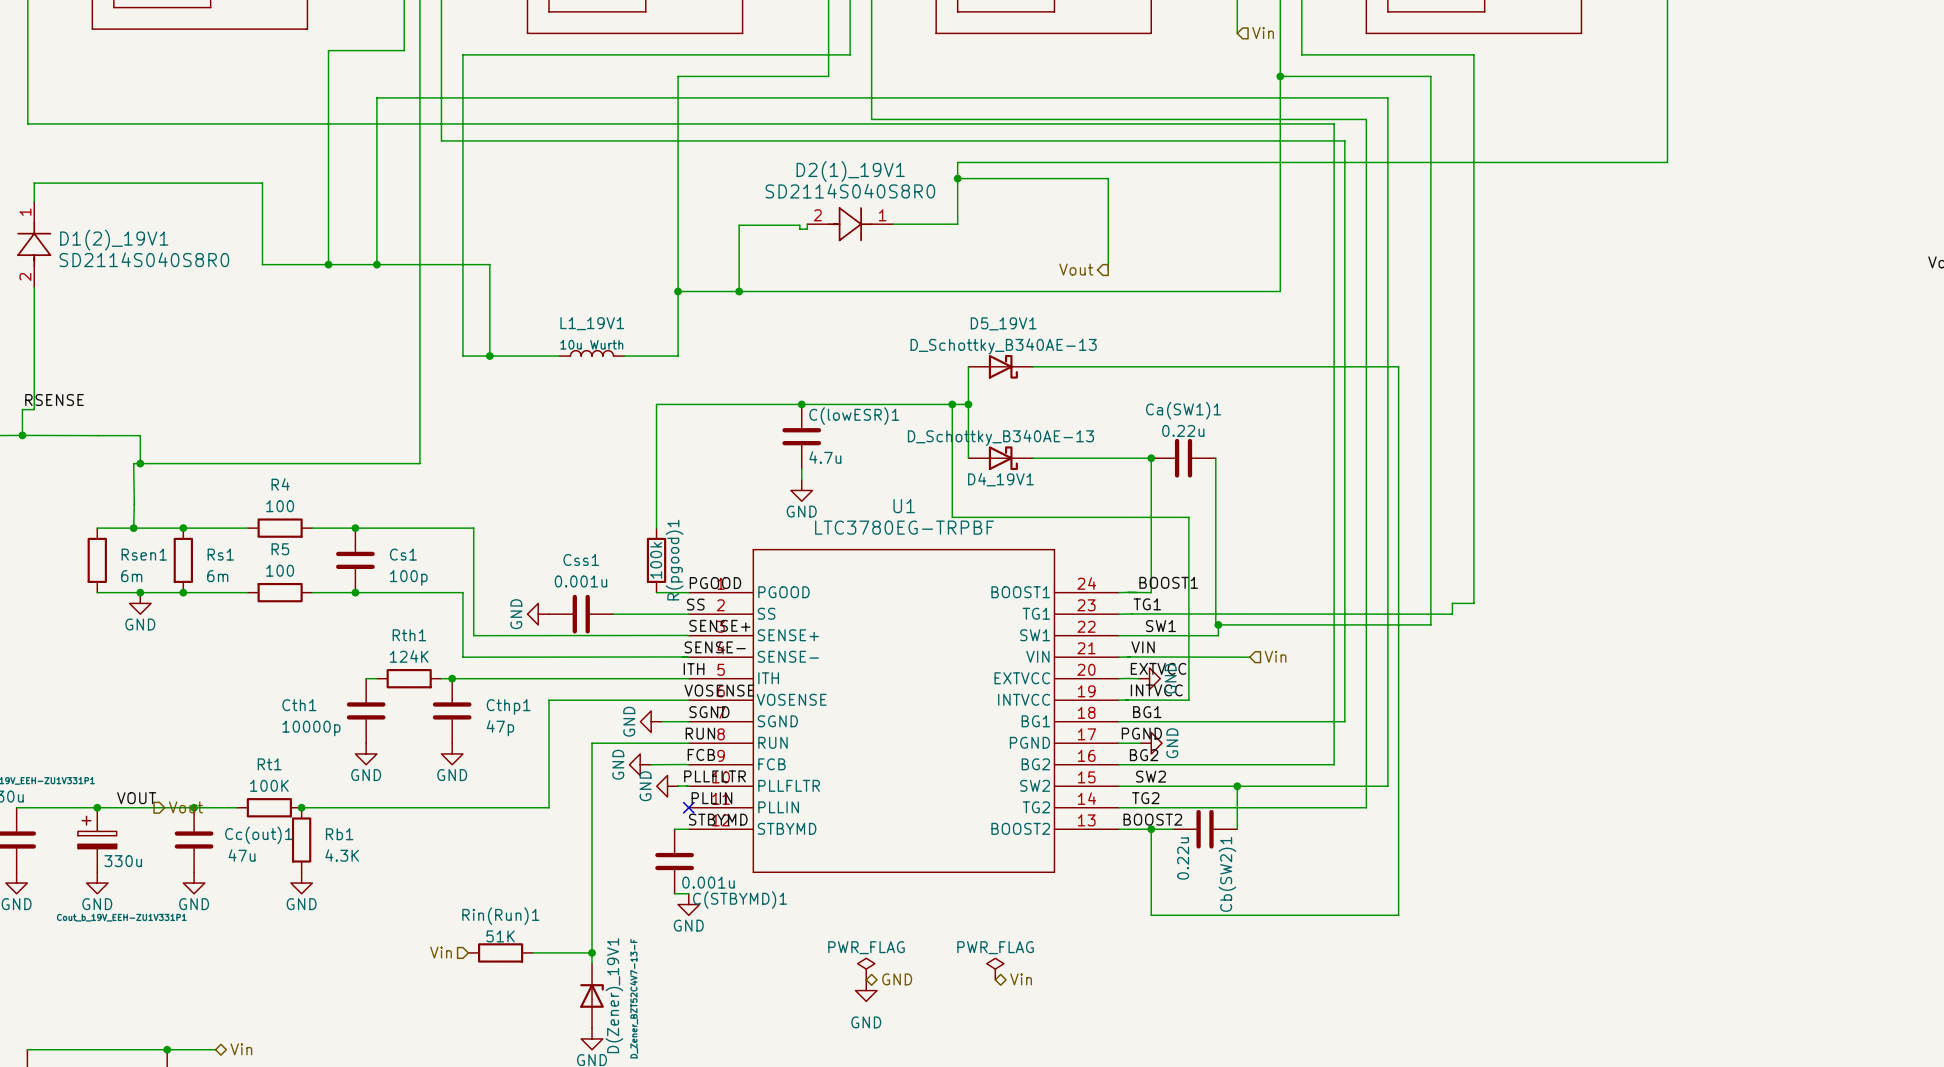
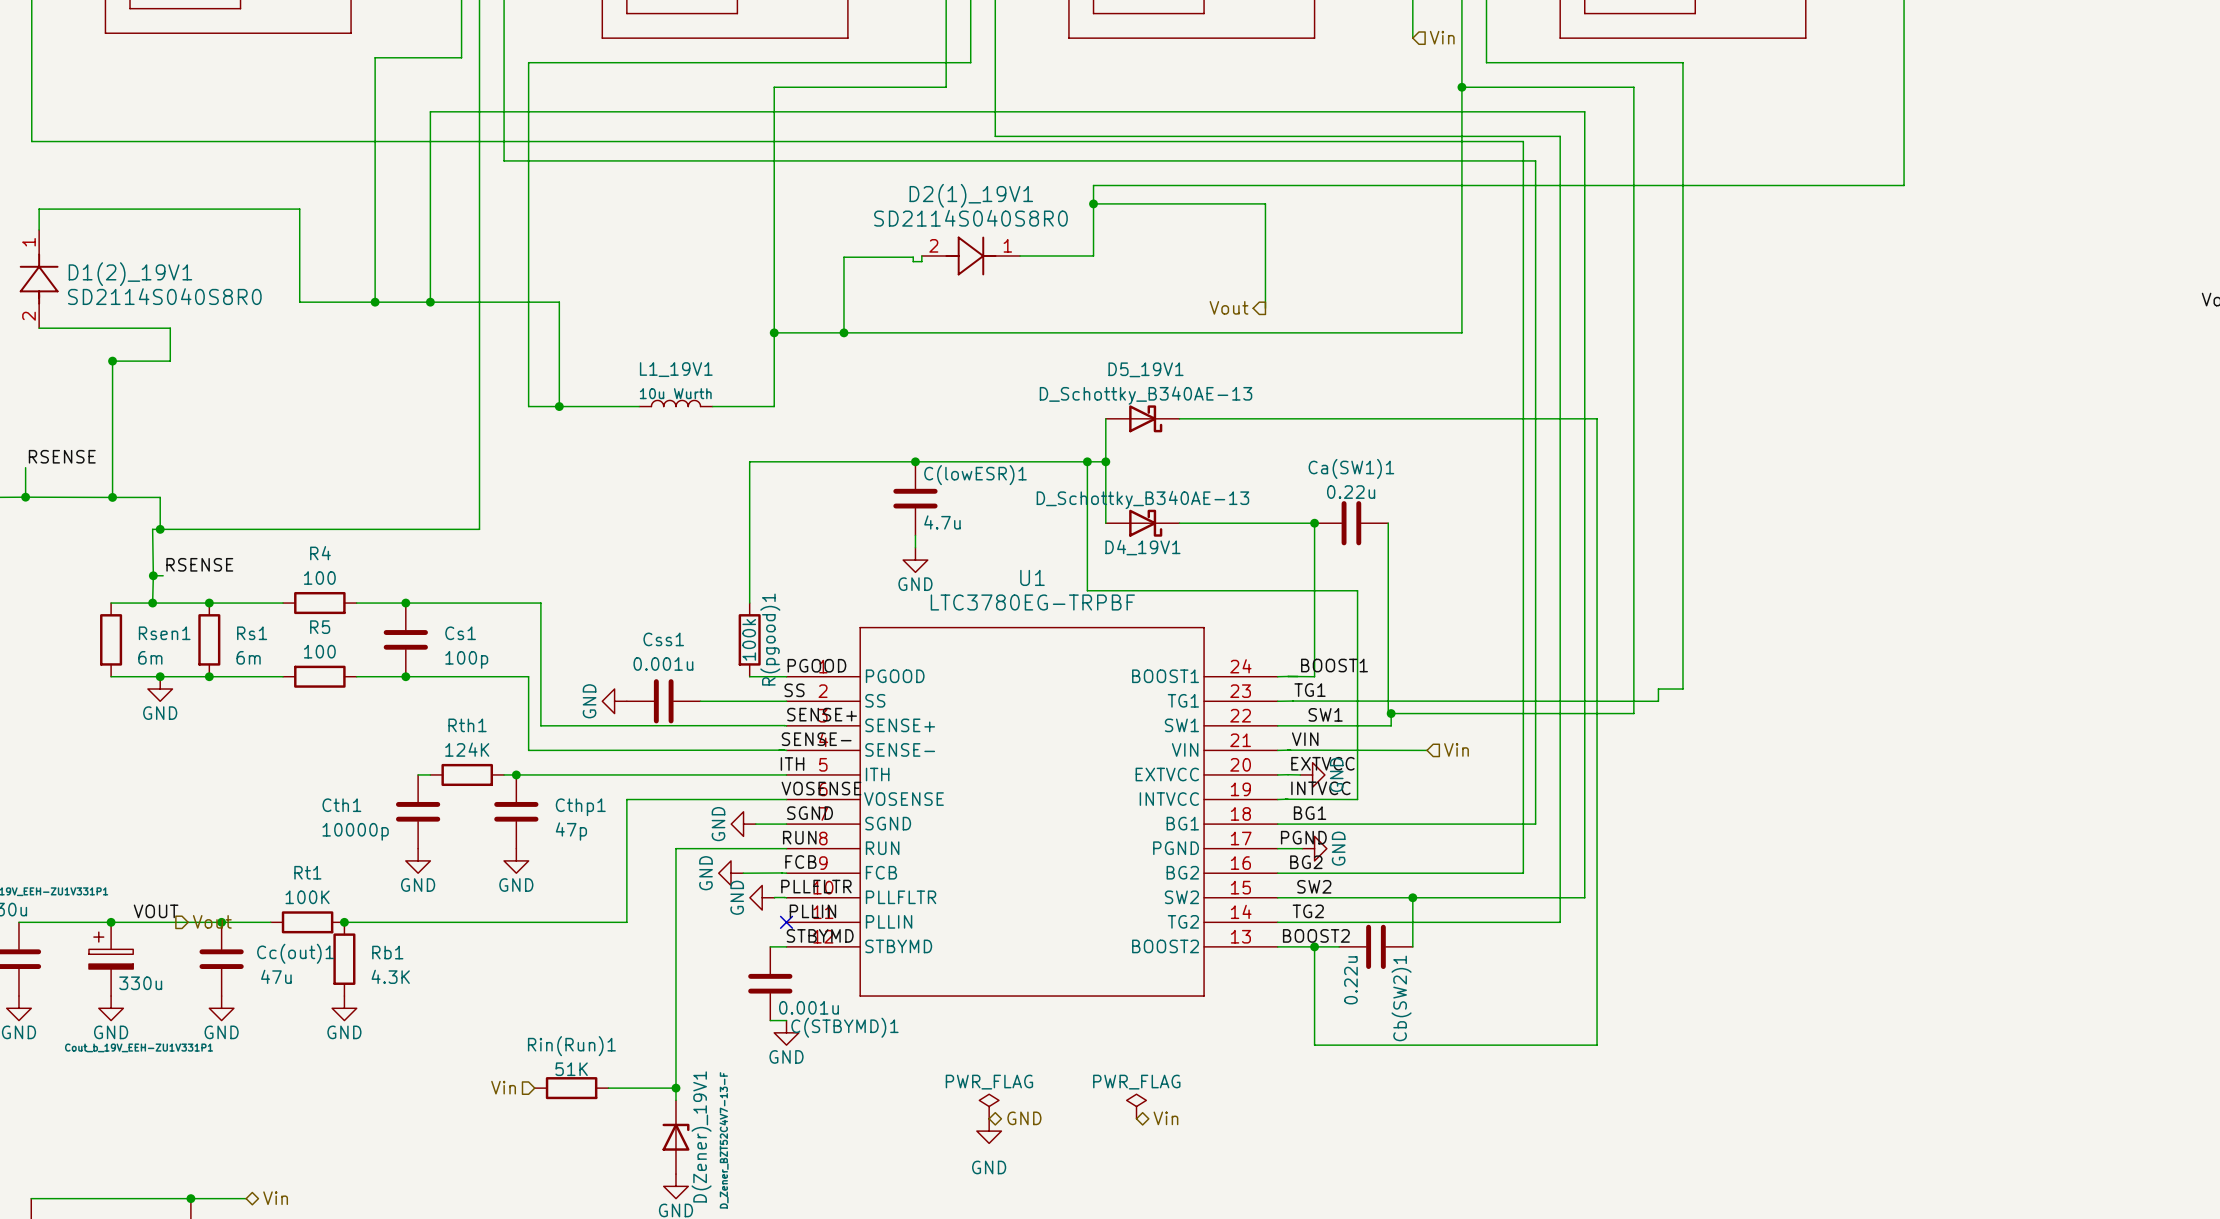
wire: (34, 287) (34, 409) (22, 409) -> (39, 328) (170, 328) (170, 361) (112, 361)
wire: none -> (112, 360) (112, 497)
junction: none -> (112, 361)
junction: none -> (112, 497)
label: none -> RSENSE (199, 564)
wire: none -> (153, 575) (163, 575)
junction: none -> (153, 575)

